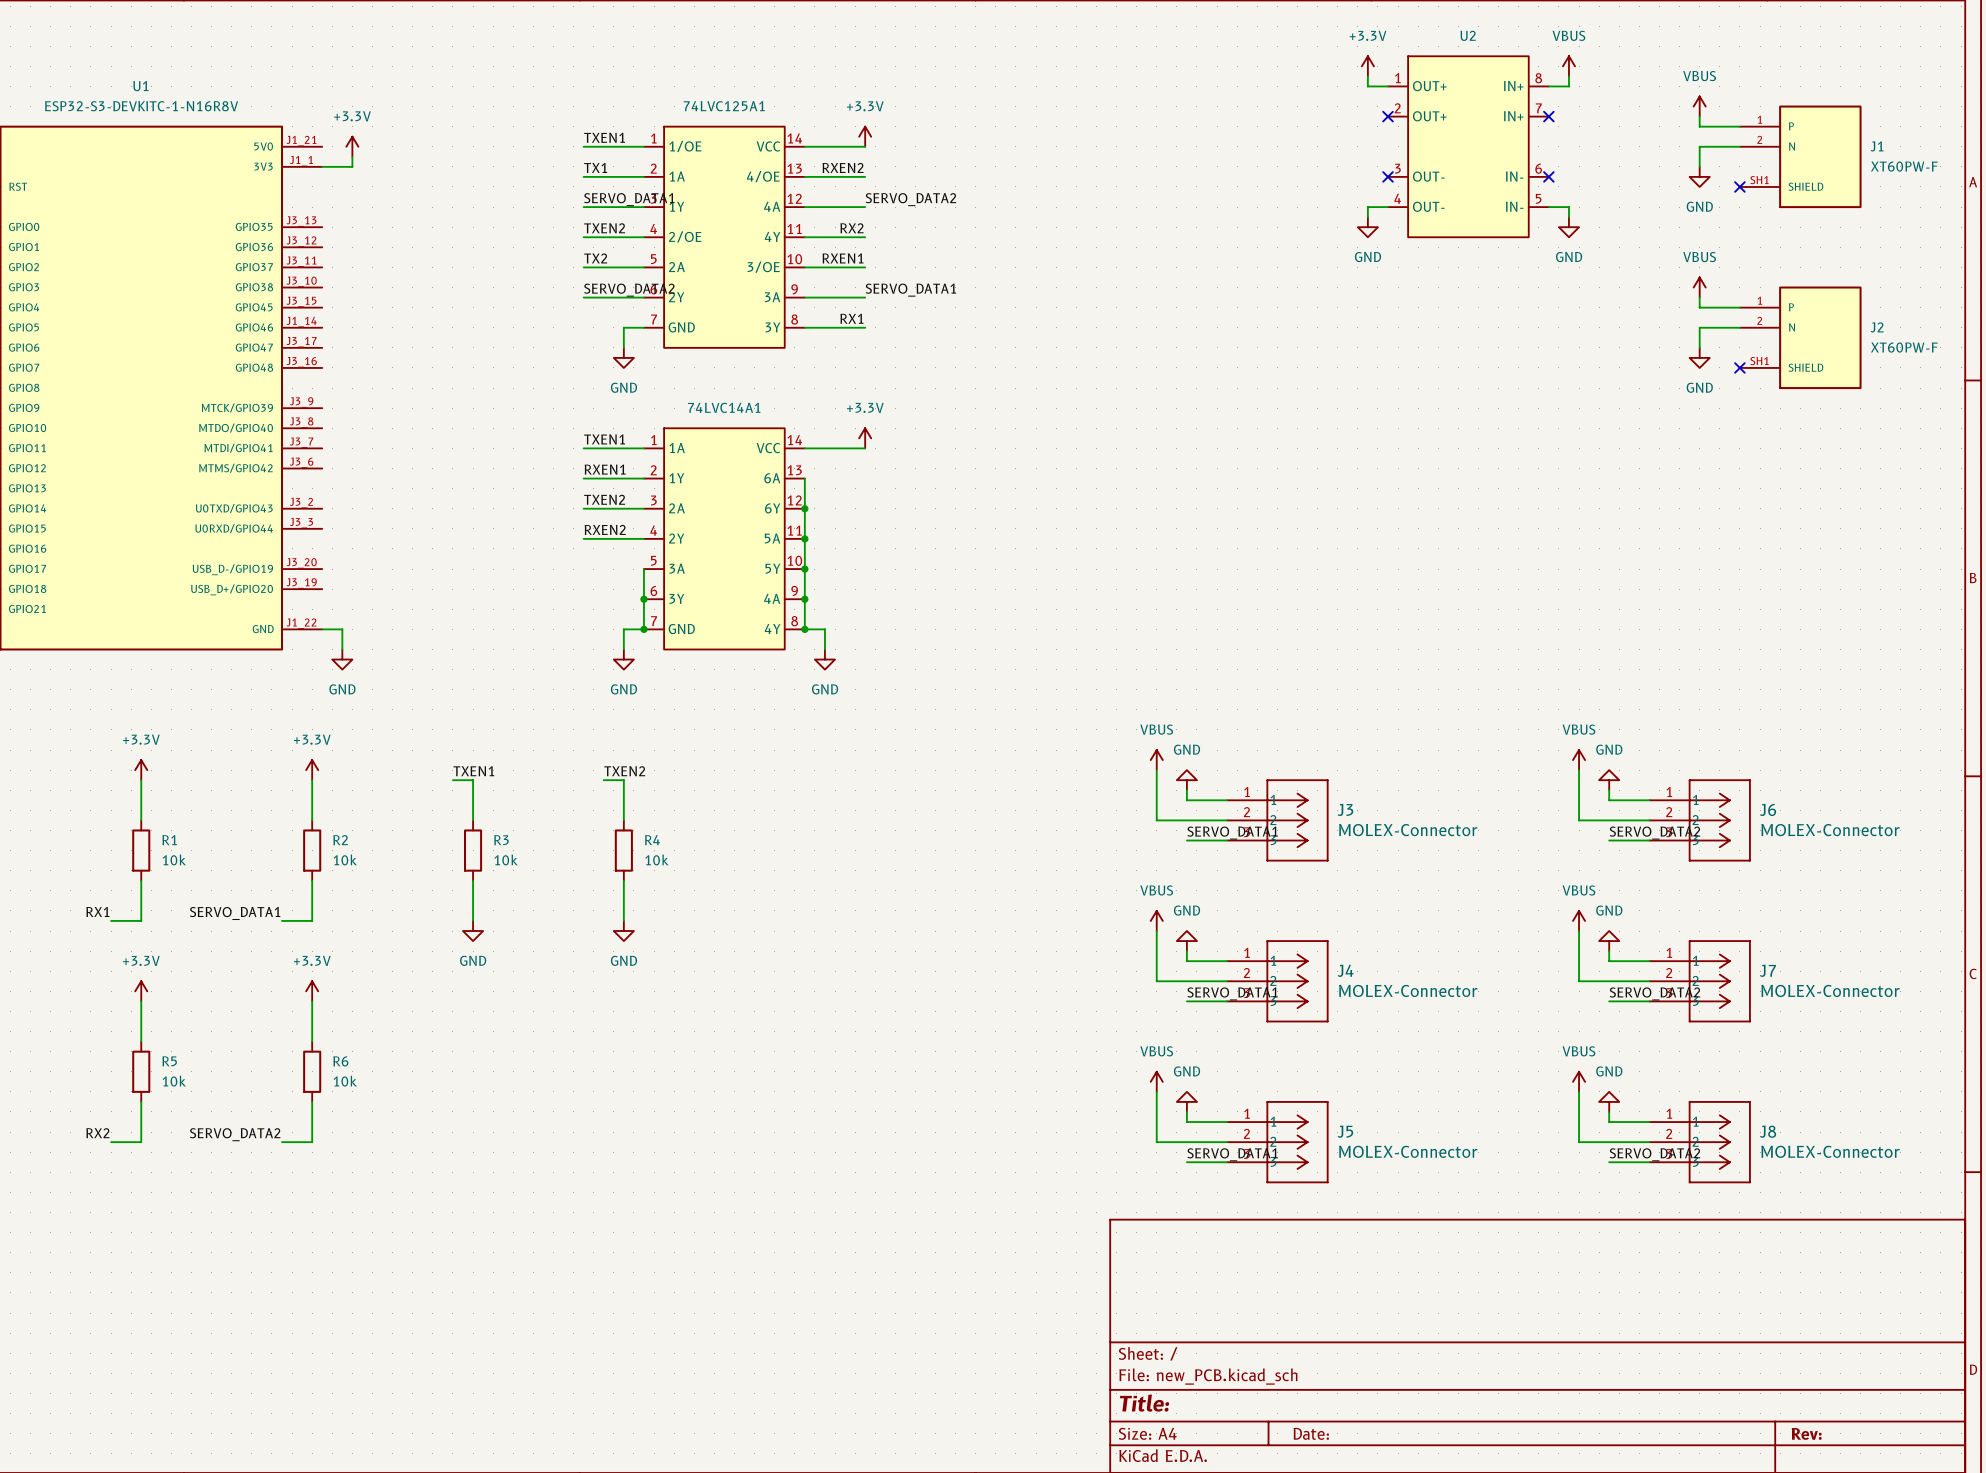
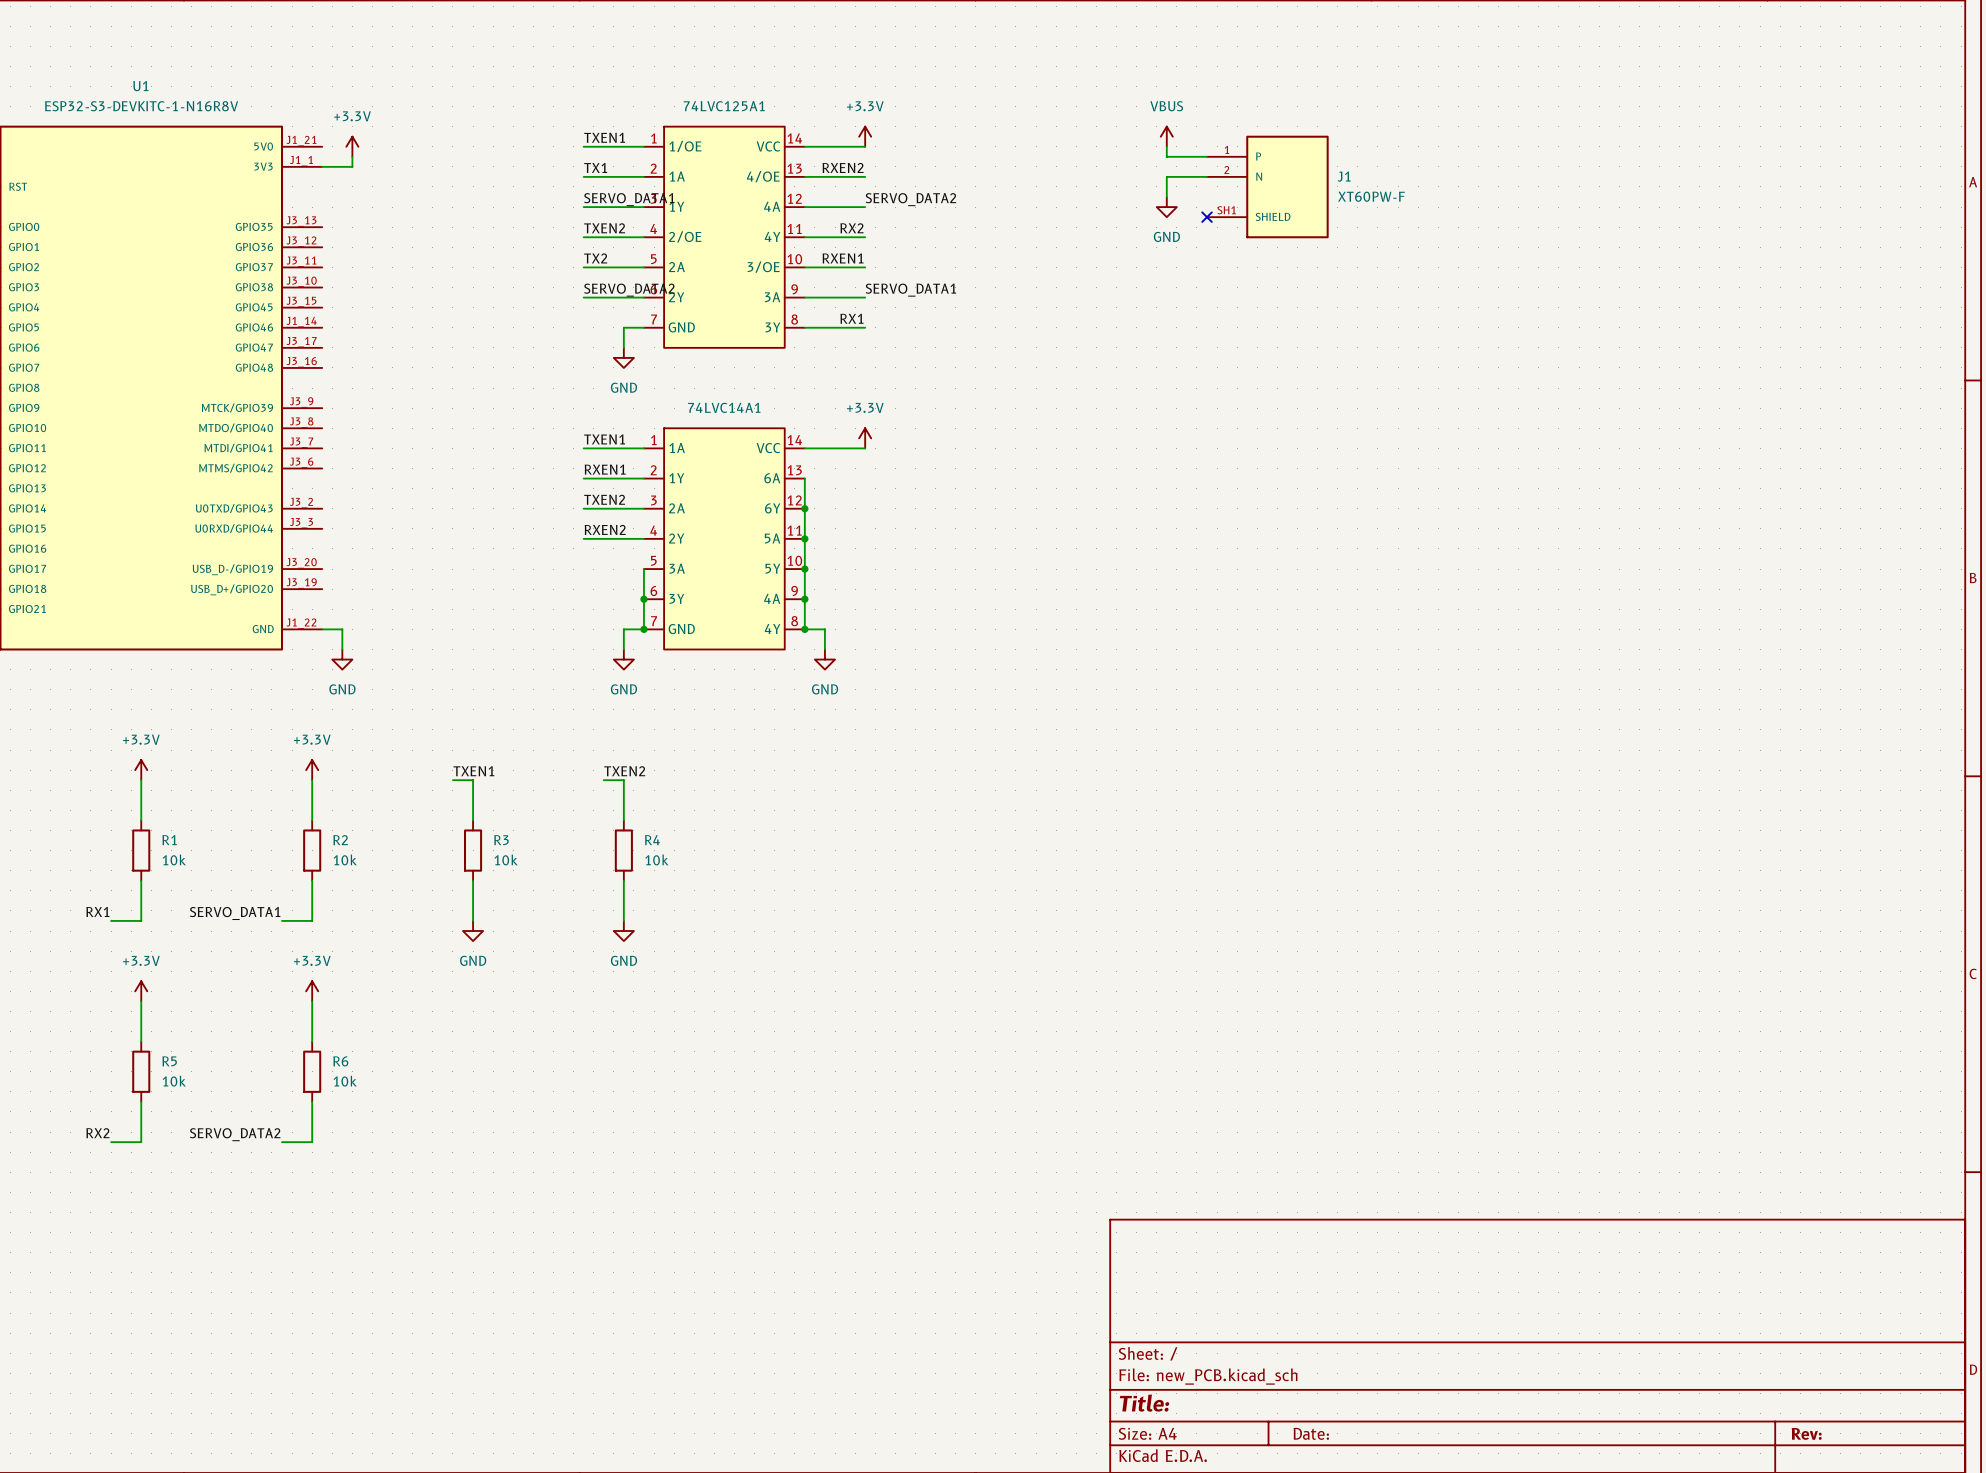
power symbol: +3.3V (1367, 66) -> none
power symbol: VBUS (1568, 66) -> none
wire: (1367, 76) (1367, 86) (1388, 86) -> none
wire: (1568, 76) (1568, 86) (1548, 86) -> none
power symbol: VBUS (1699, 106) -> none
no-connect mark: (1388, 116) -> none
no-connect mark: (1548, 116) -> none
wire: (1699, 116) (1699, 126) (1739, 126) -> none
power symbol: none -> VBUS (1166, 136)
wire: none -> (1166, 146) (1166, 156) (1207, 156)
U2: (1468, 146) -> none
wire: (1739, 146) (1699, 146) (1699, 166) -> none
J1 position: (1800, 156) -> (1267, 186)
wire: none -> (1207, 176) (1166, 176) (1166, 197)
no-connect mark: (1388, 176) -> none
no-connect mark: (1548, 176) -> none
power symbol: GND (1699, 176) -> none
no-connect mark: (1739, 186) -> none
power symbol: none -> GND (1166, 207)
wire: (1388, 207) (1367, 207) (1367, 217) -> none
wire: (1548, 207) (1568, 207) (1568, 217) -> none
no-connect mark: none -> (1207, 217)
power symbol: GND (1367, 227) -> none
power symbol: GND (1568, 227) -> none
power symbol: VBUS (1699, 287) -> none
wire: (1699, 297) (1699, 307) (1739, 307) -> none
wire: (1739, 327) (1699, 327) (1699, 347) -> none
J2: XT60PW-F (1800, 337) -> none
power symbol: GND (1699, 357) -> none
no-connect mark: (1739, 367) -> none
power symbol: VBUS (1156, 760) -> none
power symbol: VBUS (1579, 760) -> none
wire: (1156, 770) (1156, 820) (1227, 820) -> none
wire: (1579, 770) (1579, 820) (1649, 820) -> none
power symbol: GND (1186, 780) -> none
power symbol: GND (1609, 780) -> none
wire: (1186, 790) (1186, 800) (1227, 800) -> none
wire: (1609, 790) (1609, 800) (1649, 800) -> none
J3: MOLEX-Connector (1277, 820) -> none
J6: MOLEX-Connector (1699, 820) -> none
label: SERVO_DATA1 (1232, 833) -> none
label: SERVO_DATA2 (1654, 833) -> none
wire: (1186, 840) (1227, 840) -> none
wire: (1609, 840) (1649, 840) -> none
power symbol: VBUS (1156, 920) -> none
power symbol: VBUS (1579, 920) -> none
wire: (1156, 931) (1156, 981) (1227, 981) -> none
wire: (1579, 931) (1579, 981) (1649, 981) -> none
power symbol: GND (1186, 941) -> none
power symbol: GND (1609, 941) -> none
wire: (1186, 951) (1186, 961) (1227, 961) -> none
wire: (1609, 951) (1609, 961) (1649, 961) -> none
J4: MOLEX-Connector (1277, 981) -> none
J7: MOLEX-Connector (1699, 981) -> none
label: SERVO_DATA1 (1232, 993) -> none
label: SERVO_DATA2 (1654, 993) -> none
wire: (1186, 1001) (1227, 1001) -> none
wire: (1609, 1001) (1649, 1001) -> none
power symbol: VBUS (1156, 1081) -> none
power symbol: VBUS (1579, 1081) -> none
wire: (1156, 1091) (1156, 1142) (1227, 1142) -> none
wire: (1579, 1091) (1579, 1142) (1649, 1142) -> none
power symbol: GND (1186, 1101) -> none
power symbol: GND (1609, 1101) -> none
wire: (1186, 1111) (1186, 1122) (1227, 1122) -> none
wire: (1609, 1111) (1609, 1122) (1649, 1122) -> none
J5: MOLEX-Connector (1277, 1142) -> none
J8: MOLEX-Connector (1699, 1142) -> none
label: SERVO_DATA1 (1232, 1154) -> none
label: SERVO_DATA2 (1654, 1154) -> none
wire: (1186, 1162) (1227, 1162) -> none
wire: (1609, 1162) (1649, 1162) -> none

